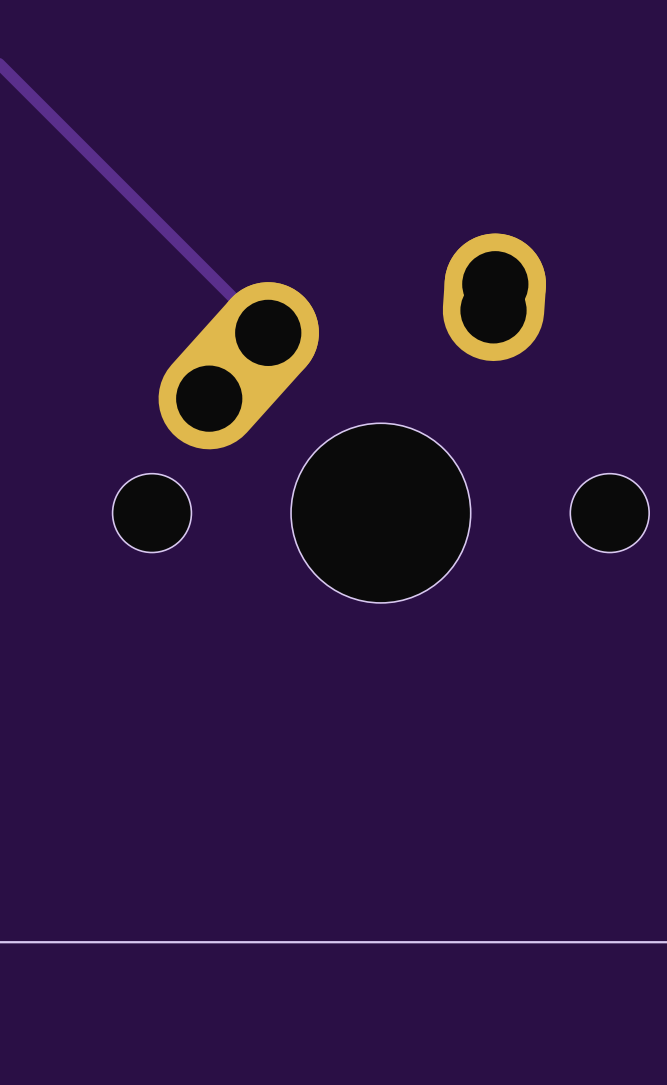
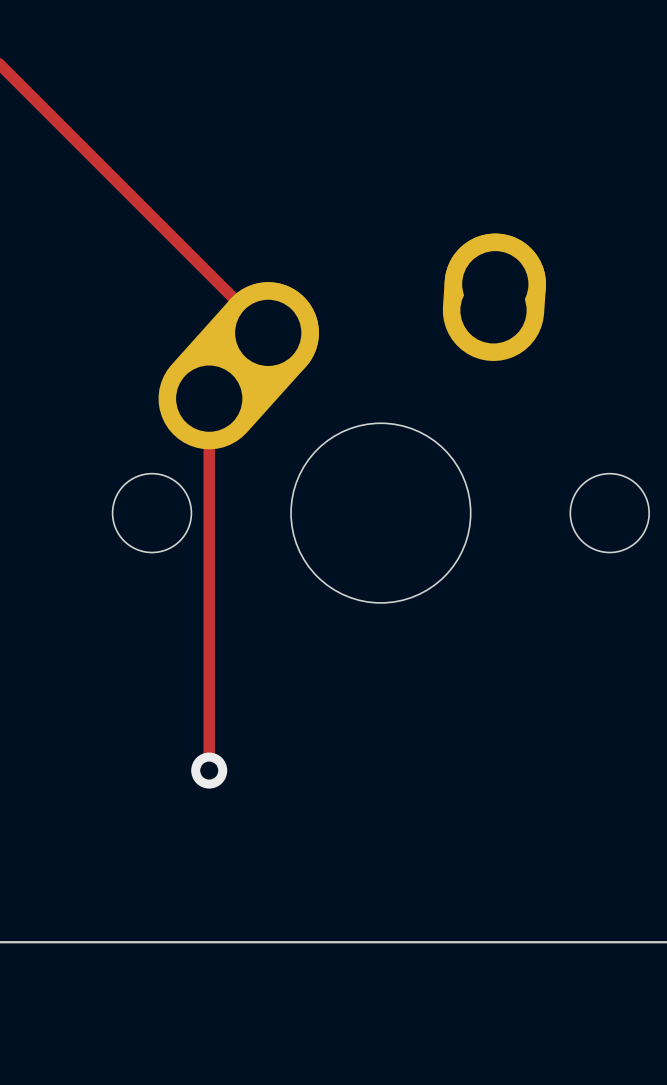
track: none -> (209, 398) (209, 770)
via: none -> (209, 770)

